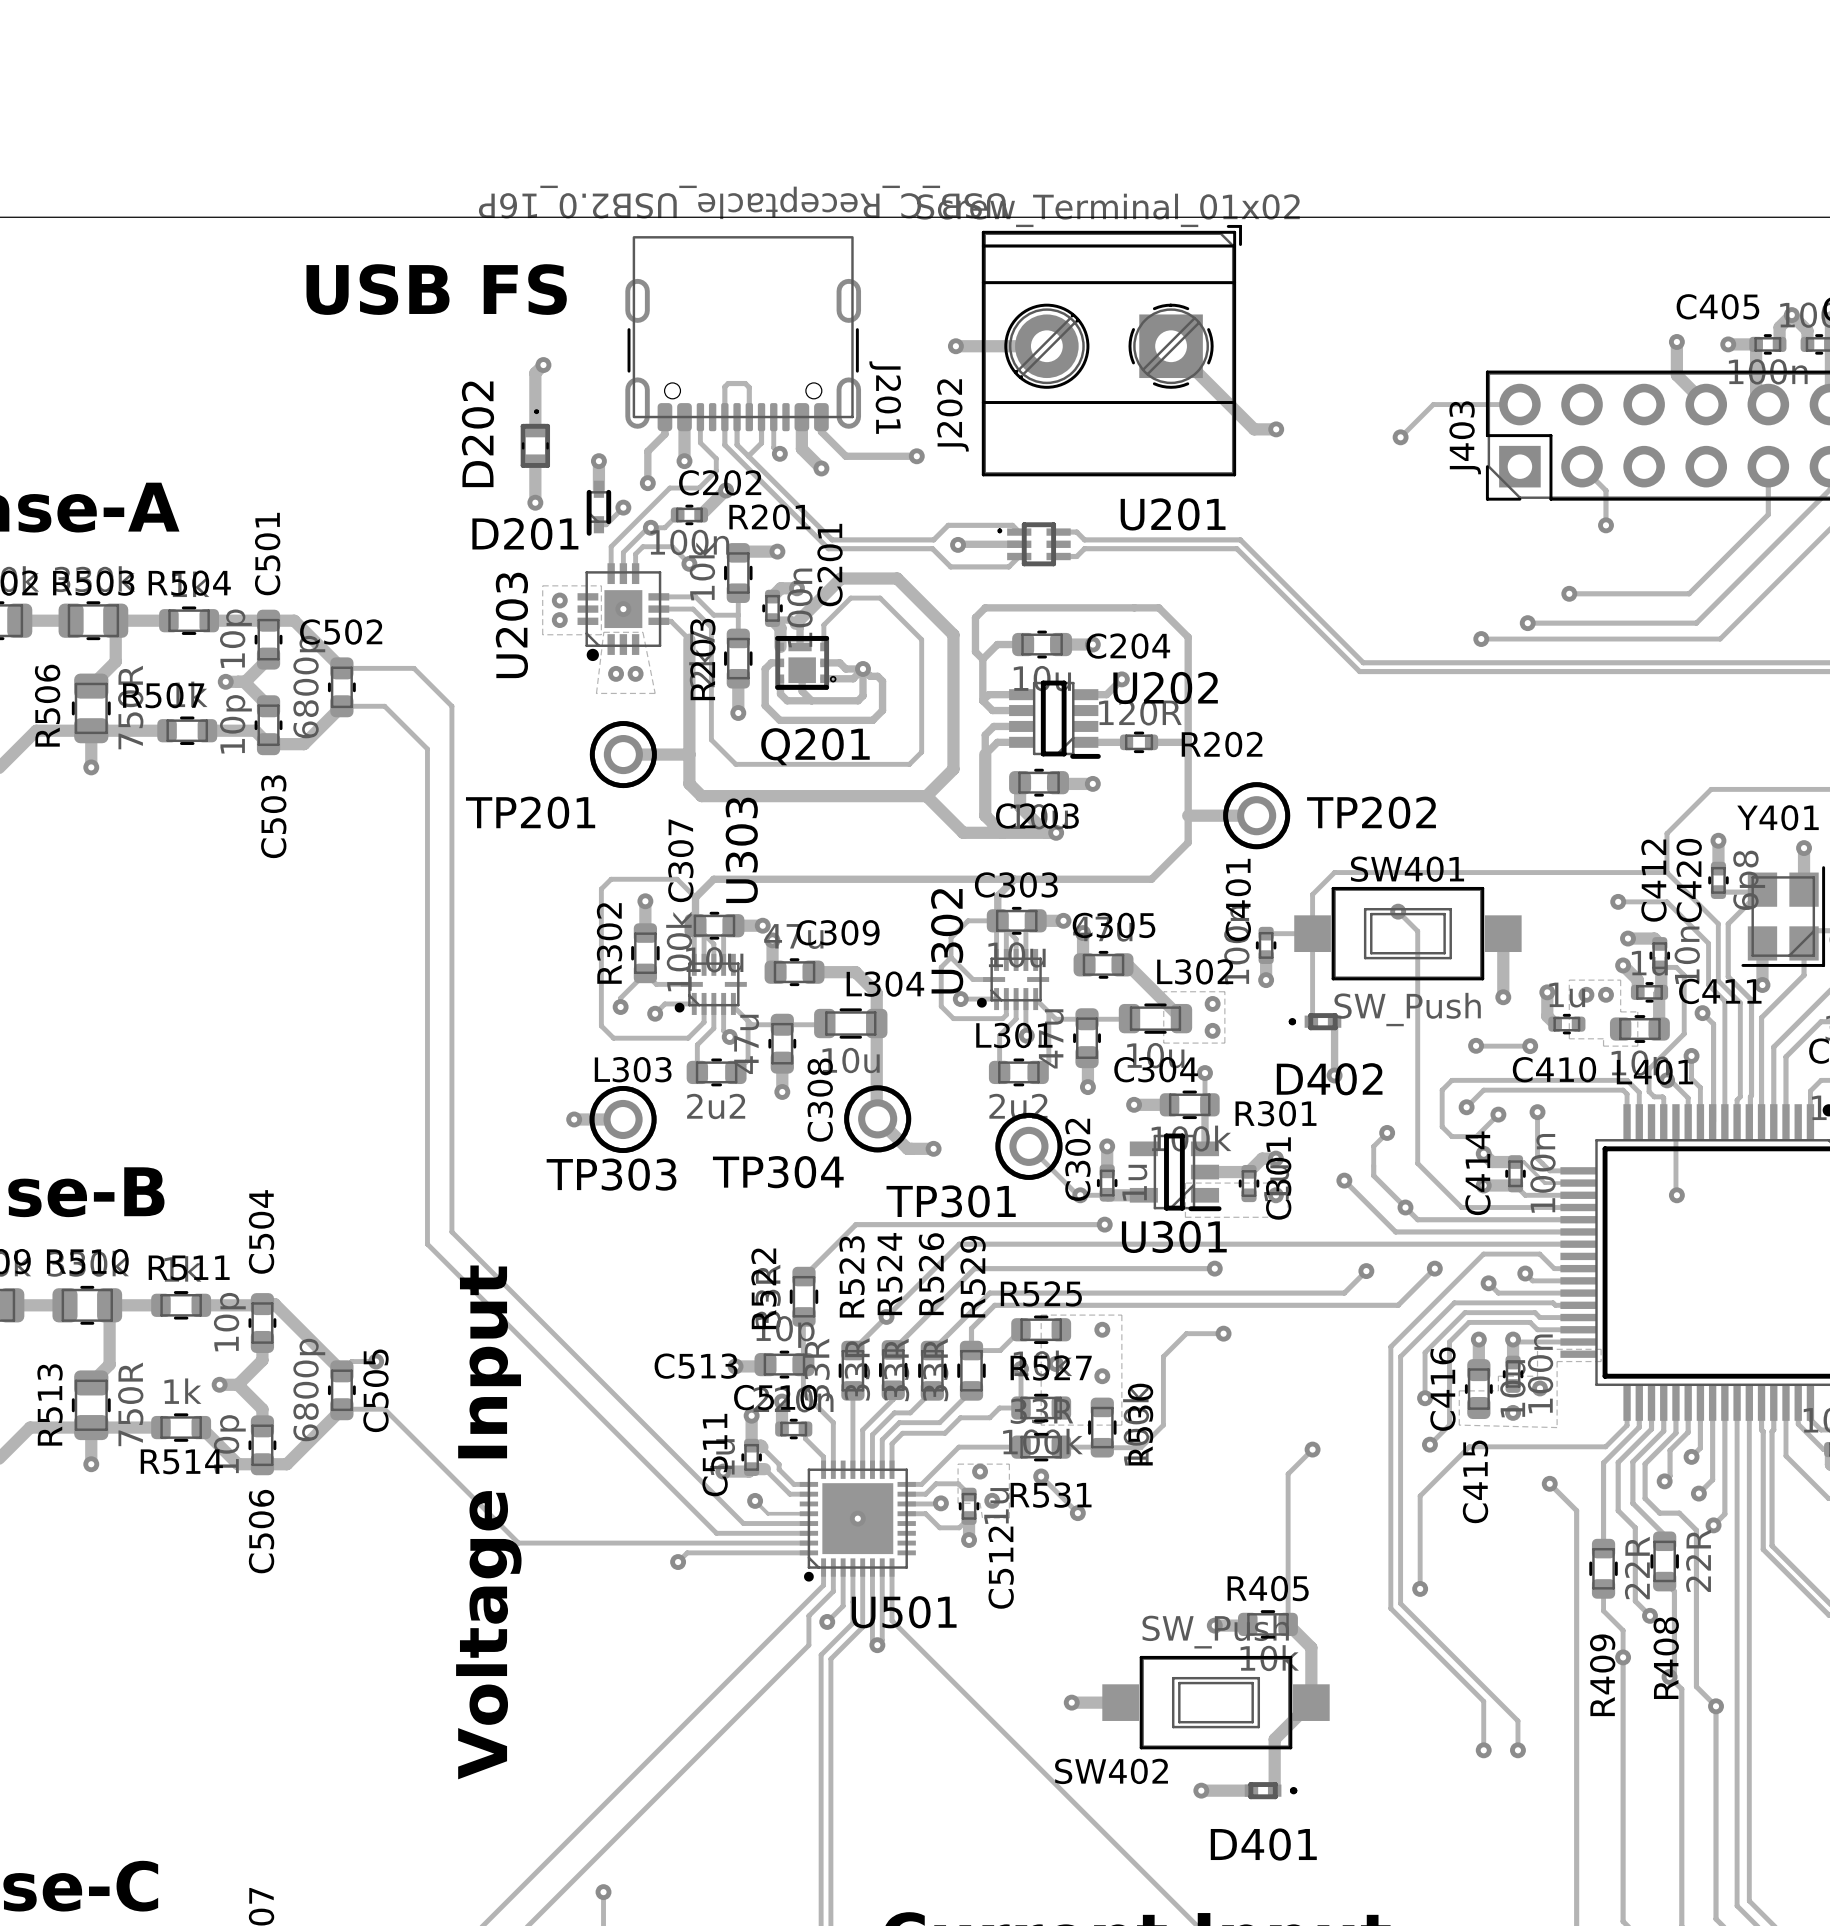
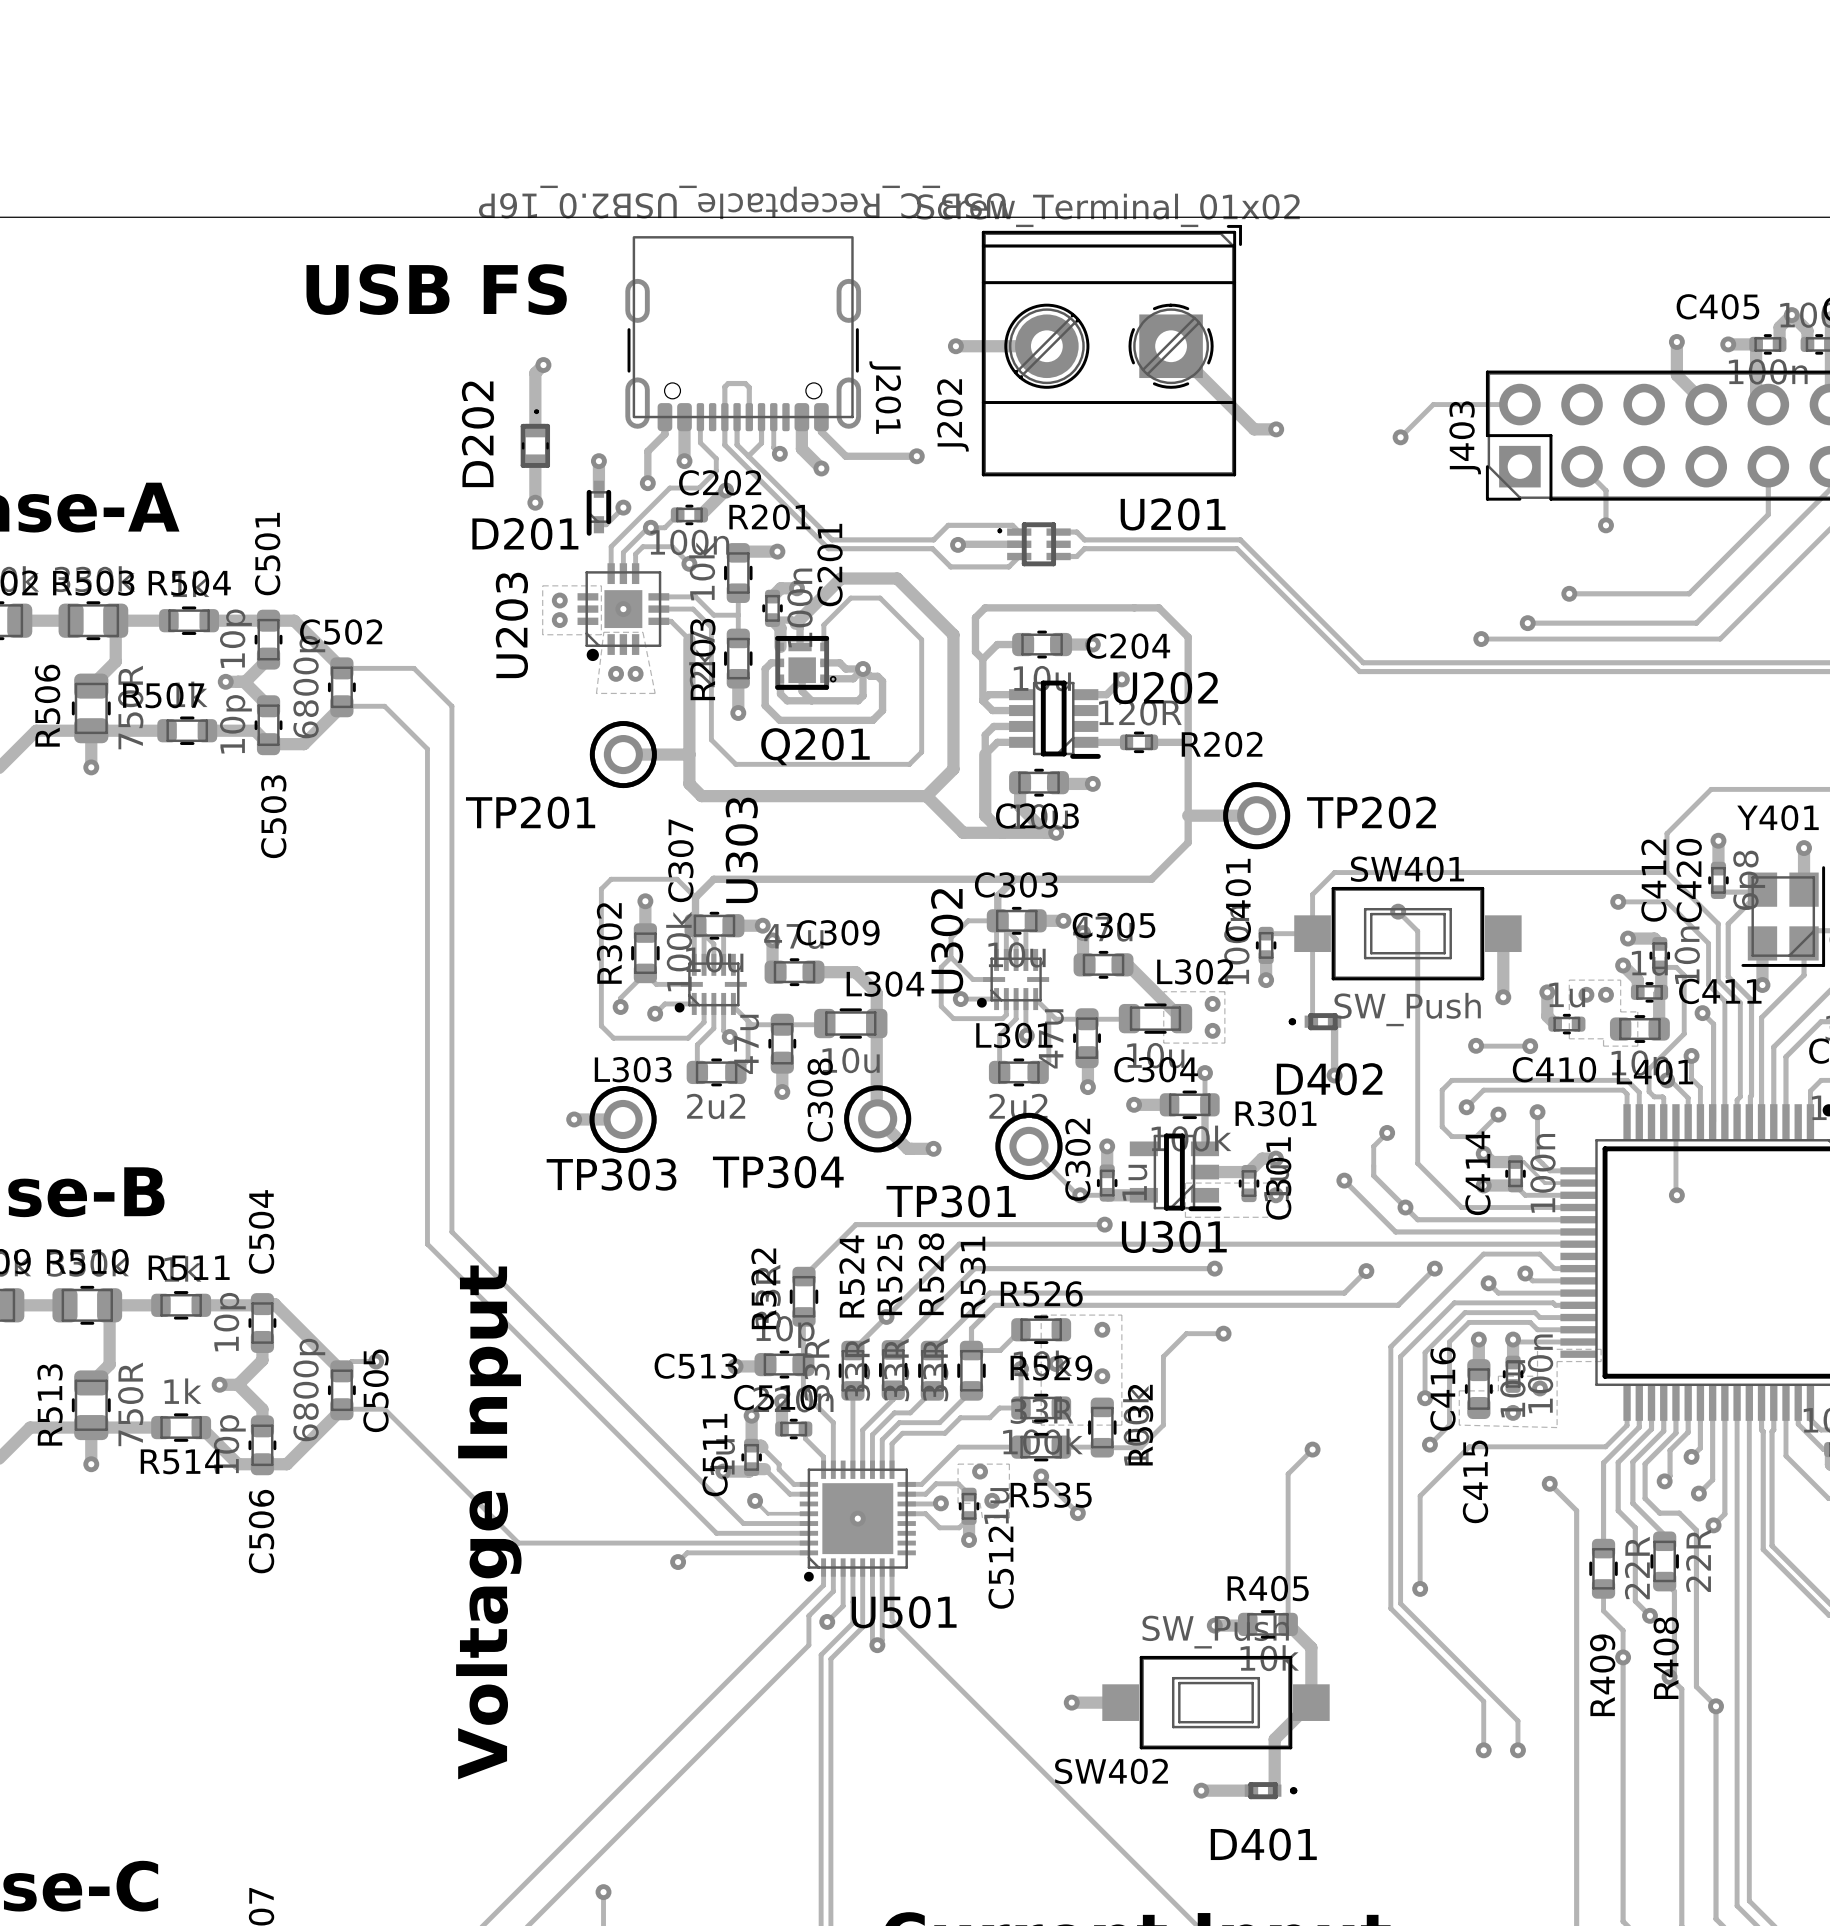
R524 name: R524 (889, 1274) -> R525 (889, 1274)
R526 name: R526 (931, 1274) -> R528 (931, 1274)
R523 name: R523 (852, 1276) -> R524 (852, 1276)
R529 name: R529 (973, 1276) -> R531 (973, 1277)
R525 name: R525 (1041, 1293) -> R526 (1041, 1293)
R527 name: R527 (1051, 1367) -> R529 (1051, 1367)
R530 name: R530 (1140, 1424) -> R532 (1140, 1425)
R531 name: R531 (1051, 1495) -> R535 (1051, 1495)

